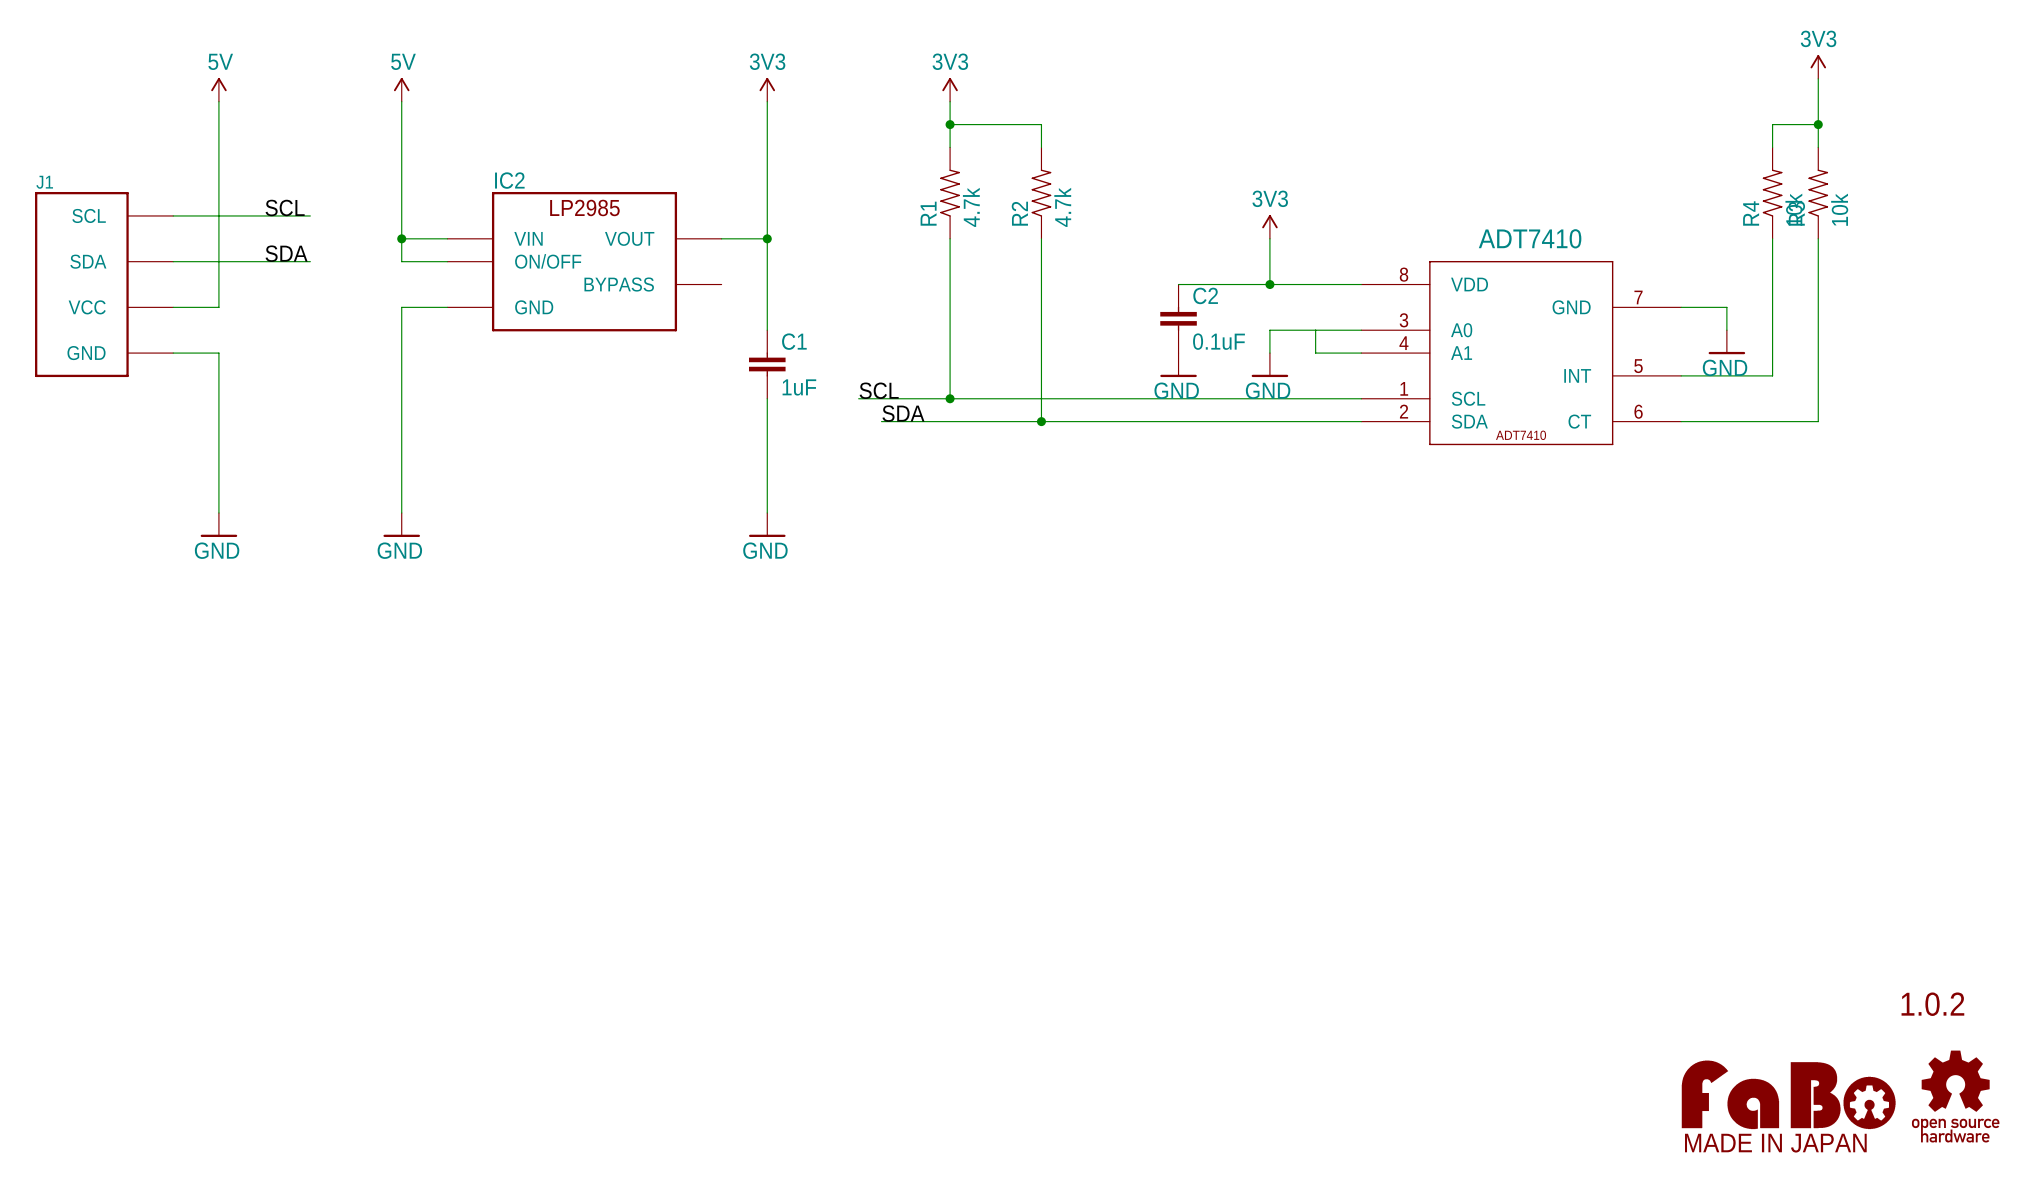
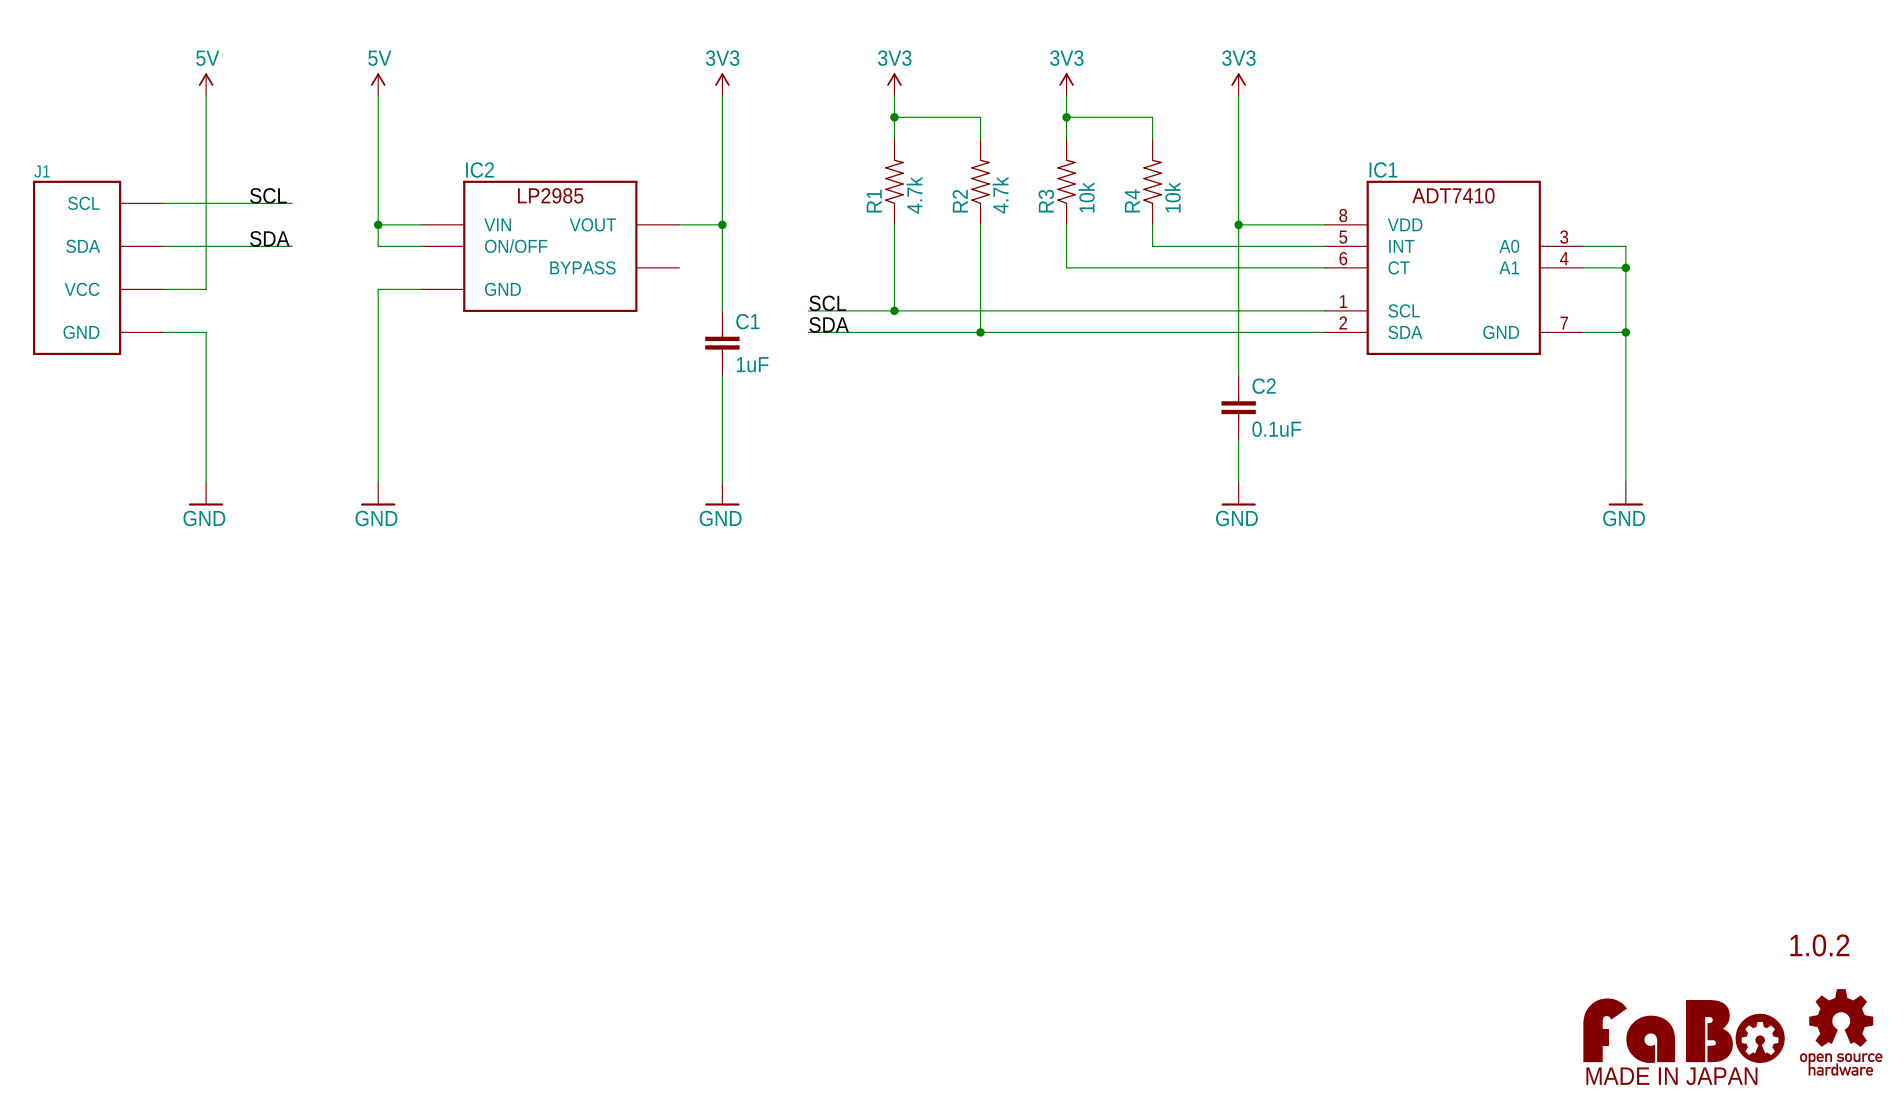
power symbol: 3V3 (1818, 67) -> none
wire: (1818, 78) (1818, 147) -> none
power symbol: none -> 3V3 (1066, 84)
power symbol: none -> 3V3 (1238, 84)
wire: none -> (1238, 95) (1238, 310)
wire: none -> (1066, 117) (1152, 117) (1152, 138)
junction: none -> (1066, 117)
wire: (1818, 124) (1772, 124) (1772, 147) -> none
junction: (1818, 124) -> none
R4 position: (1772, 193) -> (1152, 181)
R3 position: (1818, 193) -> (1066, 181)
power symbol: 3V3 (1269, 226) -> none
wire: none -> (1066, 224) (1066, 267) (1109, 267)
wire: none -> (1152, 224) (1152, 246) (1324, 246)
wire: (1269, 238) (1269, 284) -> (1066, 95) (1066, 138)
wire: none -> (1238, 224) (1324, 224)
junction: none -> (1238, 224)
wire: (1772, 238) (1772, 375) (1681, 375) -> none
wire: (1818, 238) (1818, 421) (1681, 421) -> none
junction: (1269, 284) -> none
IC1: none -> (1453, 267)
wire: none -> (1582, 267) (1625, 267)
junction: none -> (1625, 267)
wire: (1681, 307) (1726, 307) -> (1582, 246) (1625, 246) (1625, 289)
C2 position: (1178, 318) -> (1238, 407)
wire: (950, 330) (950, 398) -> none
junction: none -> (894, 310)
wire: (1269, 330) (1269, 353) -> (1195, 310) (808, 310)
wire: none -> (1625, 310) (1625, 482)
power symbol position: GND (1726, 342) -> GND (1625, 494)
wire: none -> (808, 332) (1238, 332) (1238, 375)
wire: (1041, 353) (1041, 421) -> none
junction: none -> (980, 332)
ADT7410: (1521, 353) -> none
wire: none -> (1582, 332) (1625, 332)
junction: none -> (1625, 332)
power symbol: GND (1178, 365) -> none
power symbol: GND (1269, 365) -> none
label position: SCL (879, 390) -> SCL (827, 303)
wire: (858, 398) (1361, 398) -> none
junction: (950, 398) -> none
label position: SDA (903, 413) -> SDA (829, 324)
wire: (881, 421) (1361, 421) -> none
junction: (1041, 421) -> none
wire: none -> (1238, 439) (1238, 482)
power symbol: none -> GND (1238, 494)

